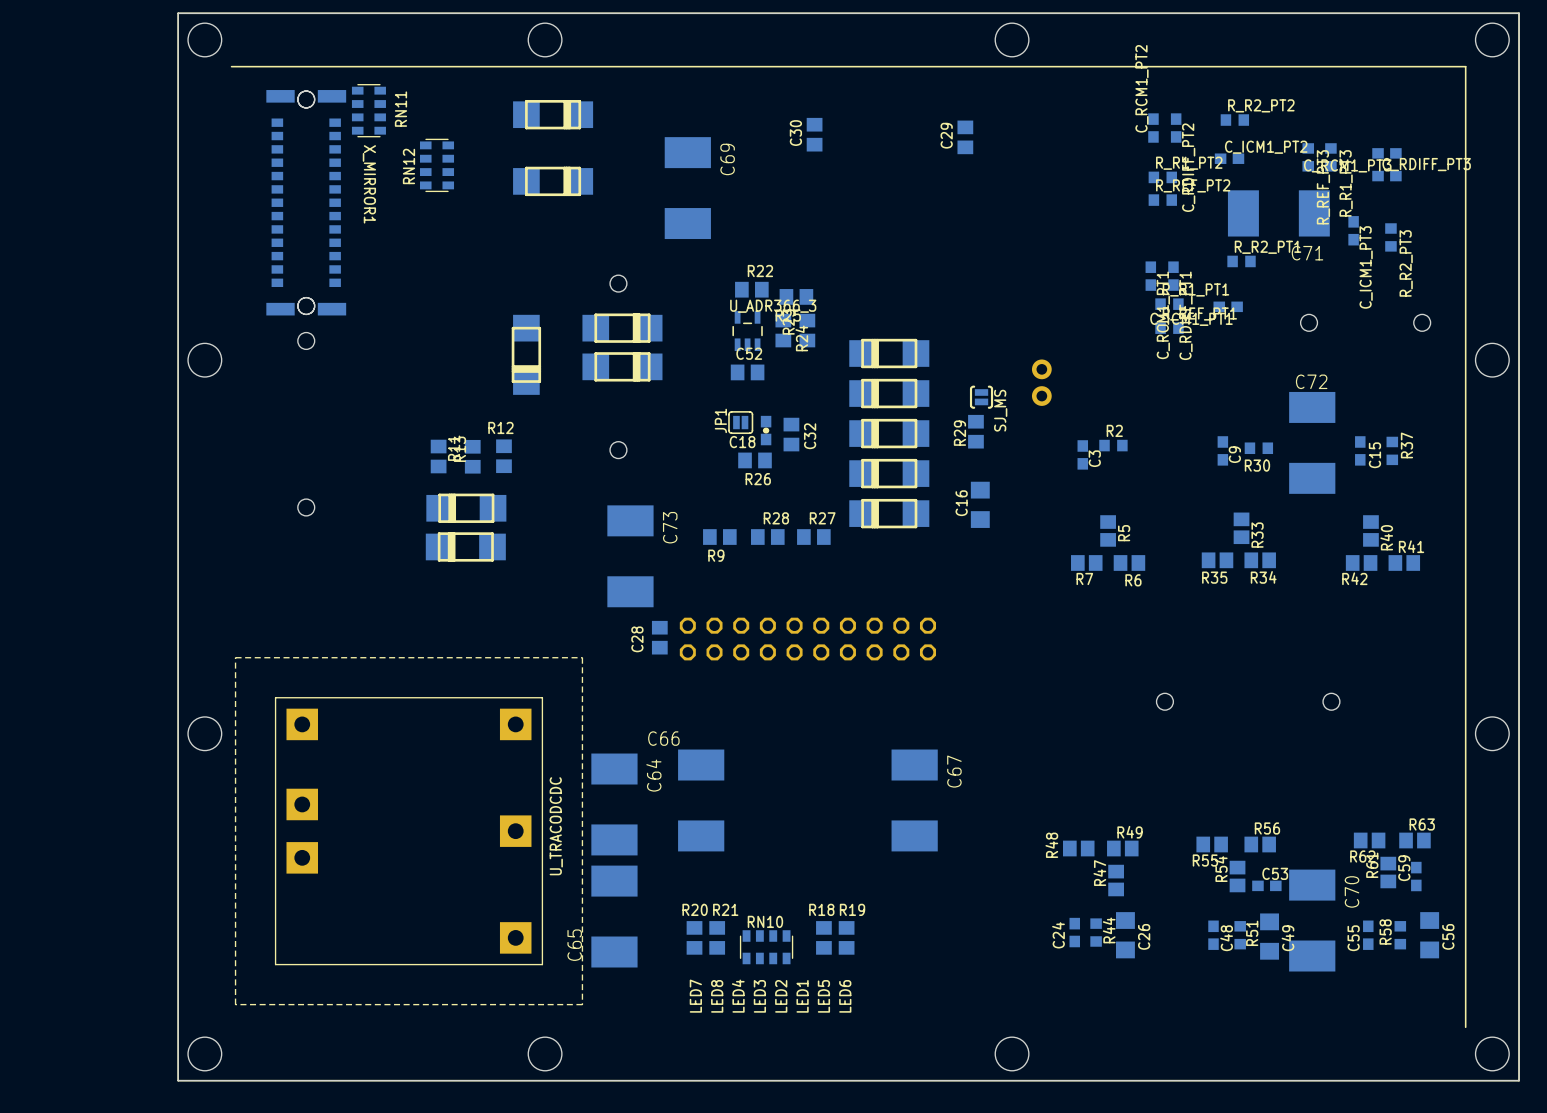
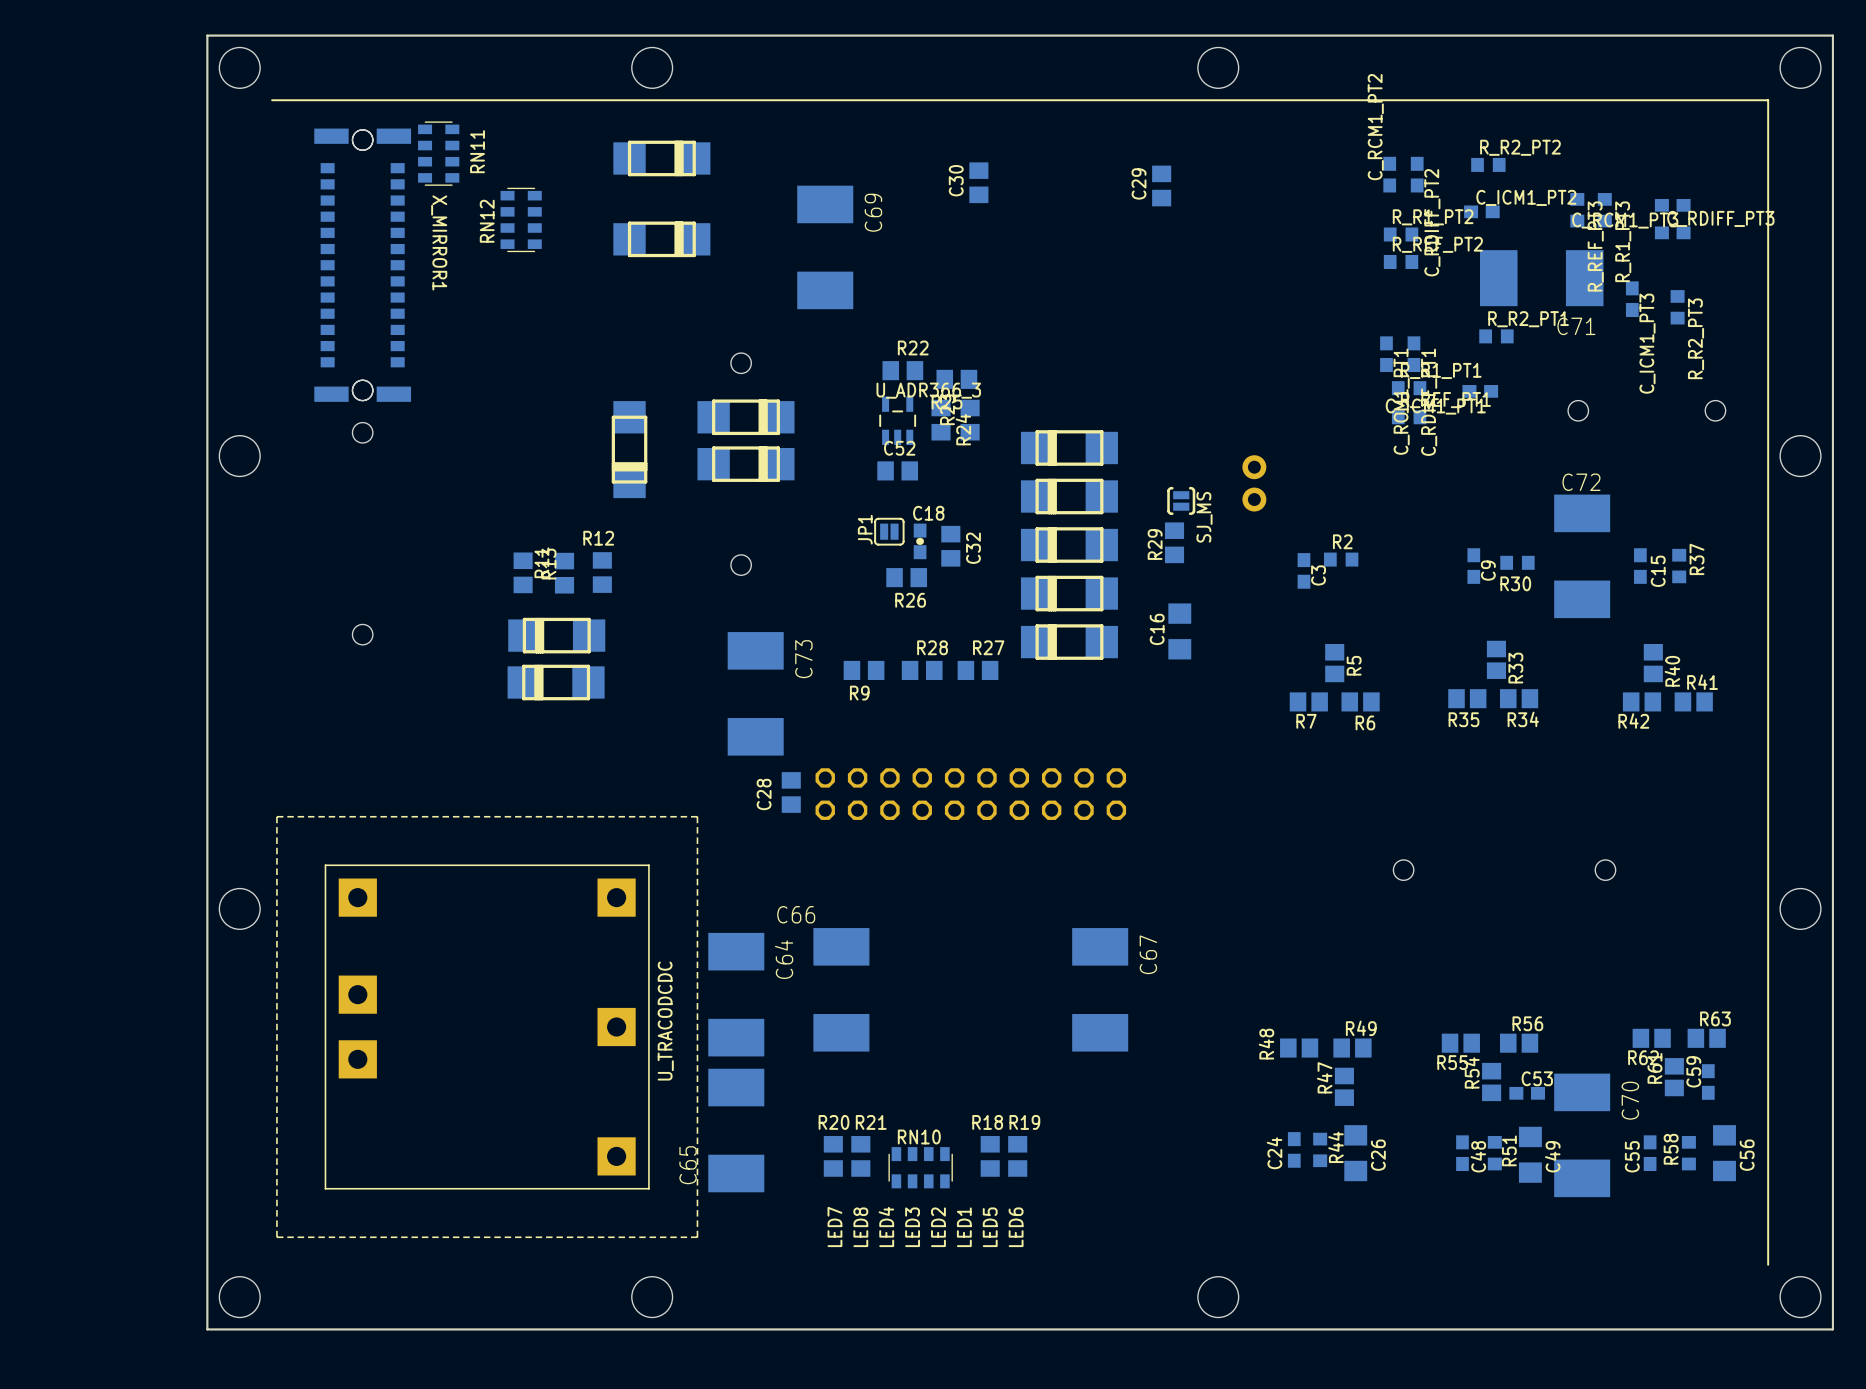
C18 name position: C18 (742, 442) -> C18 (928, 513)

